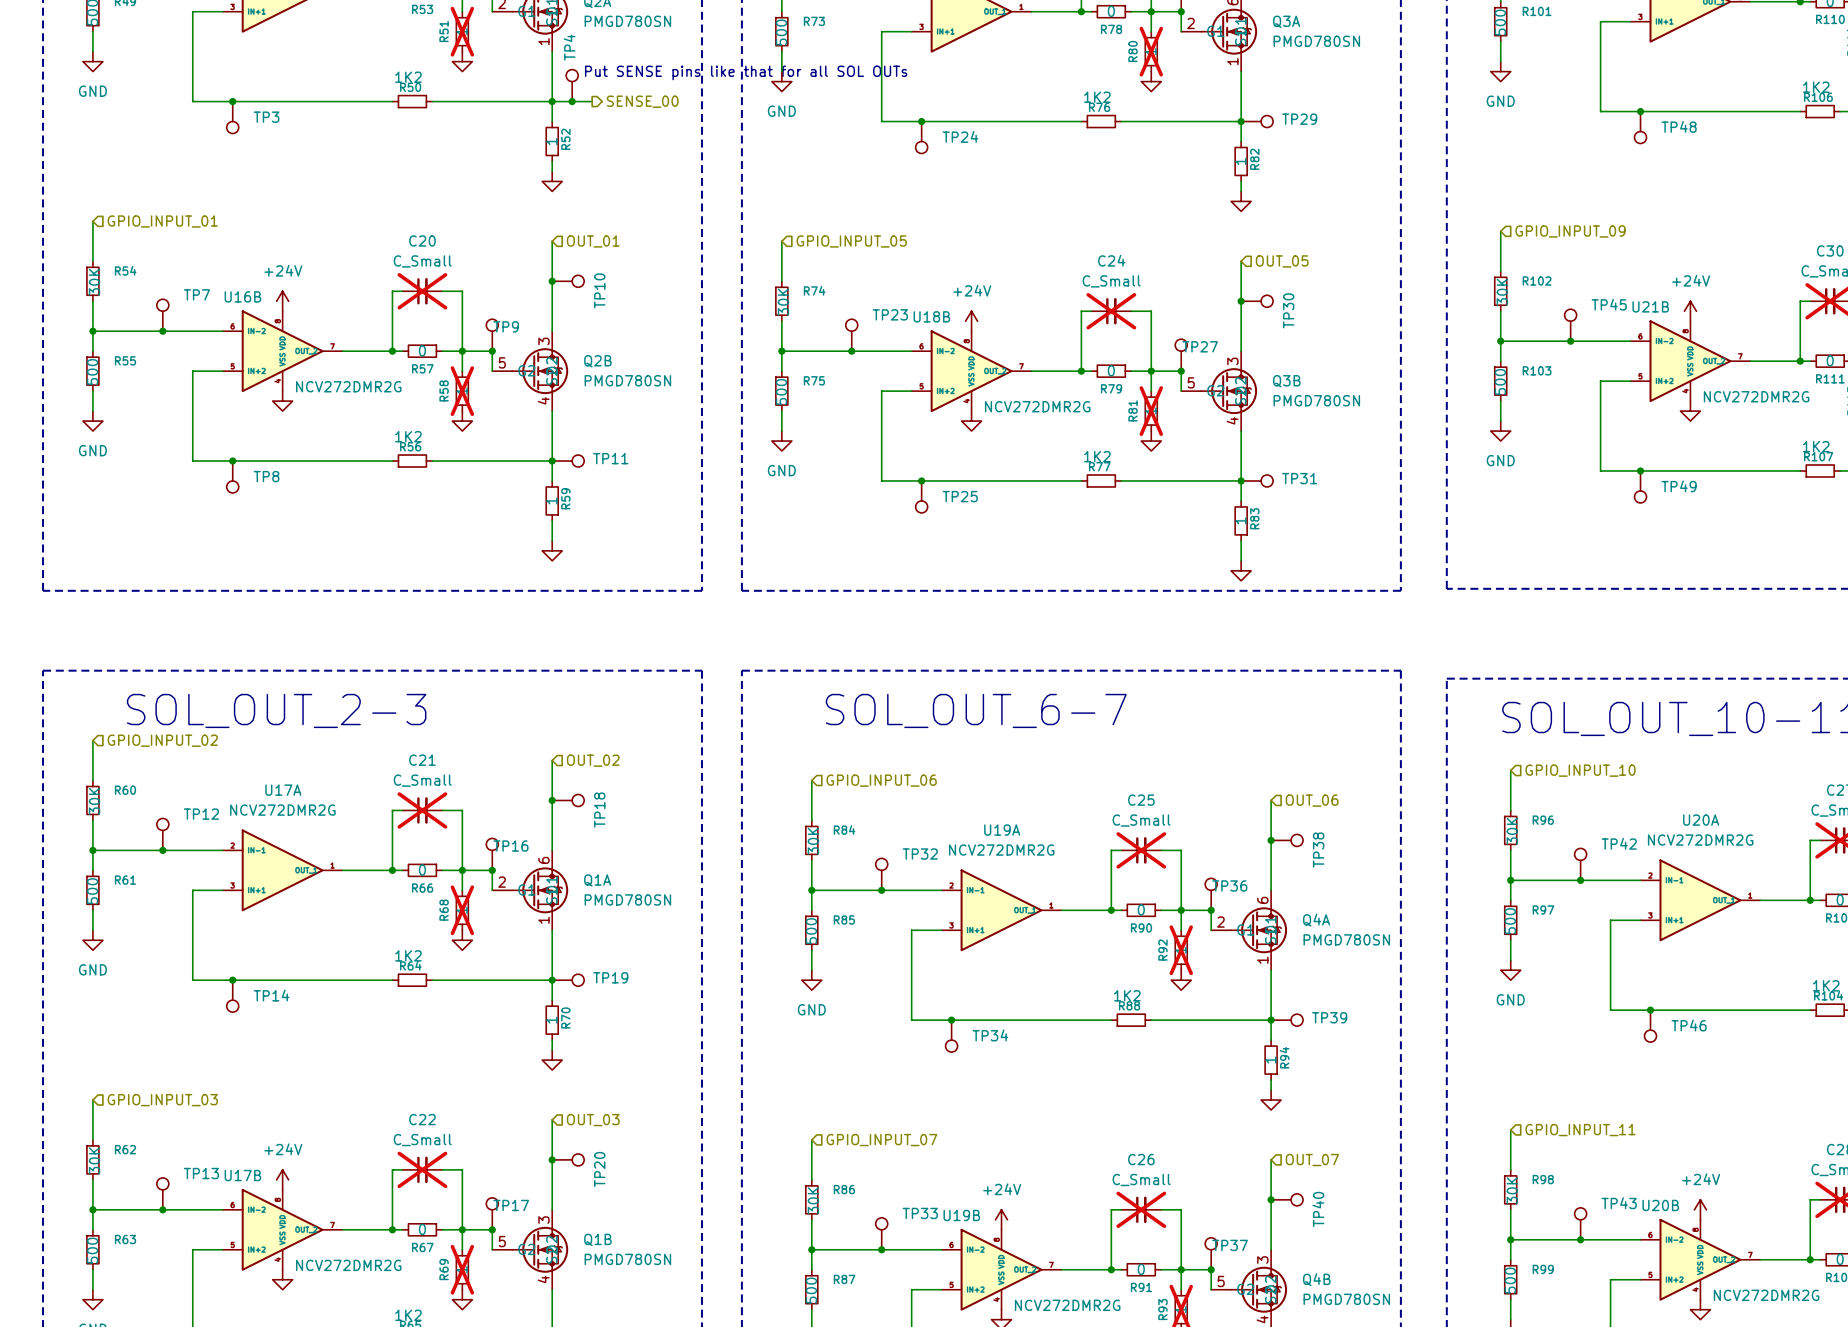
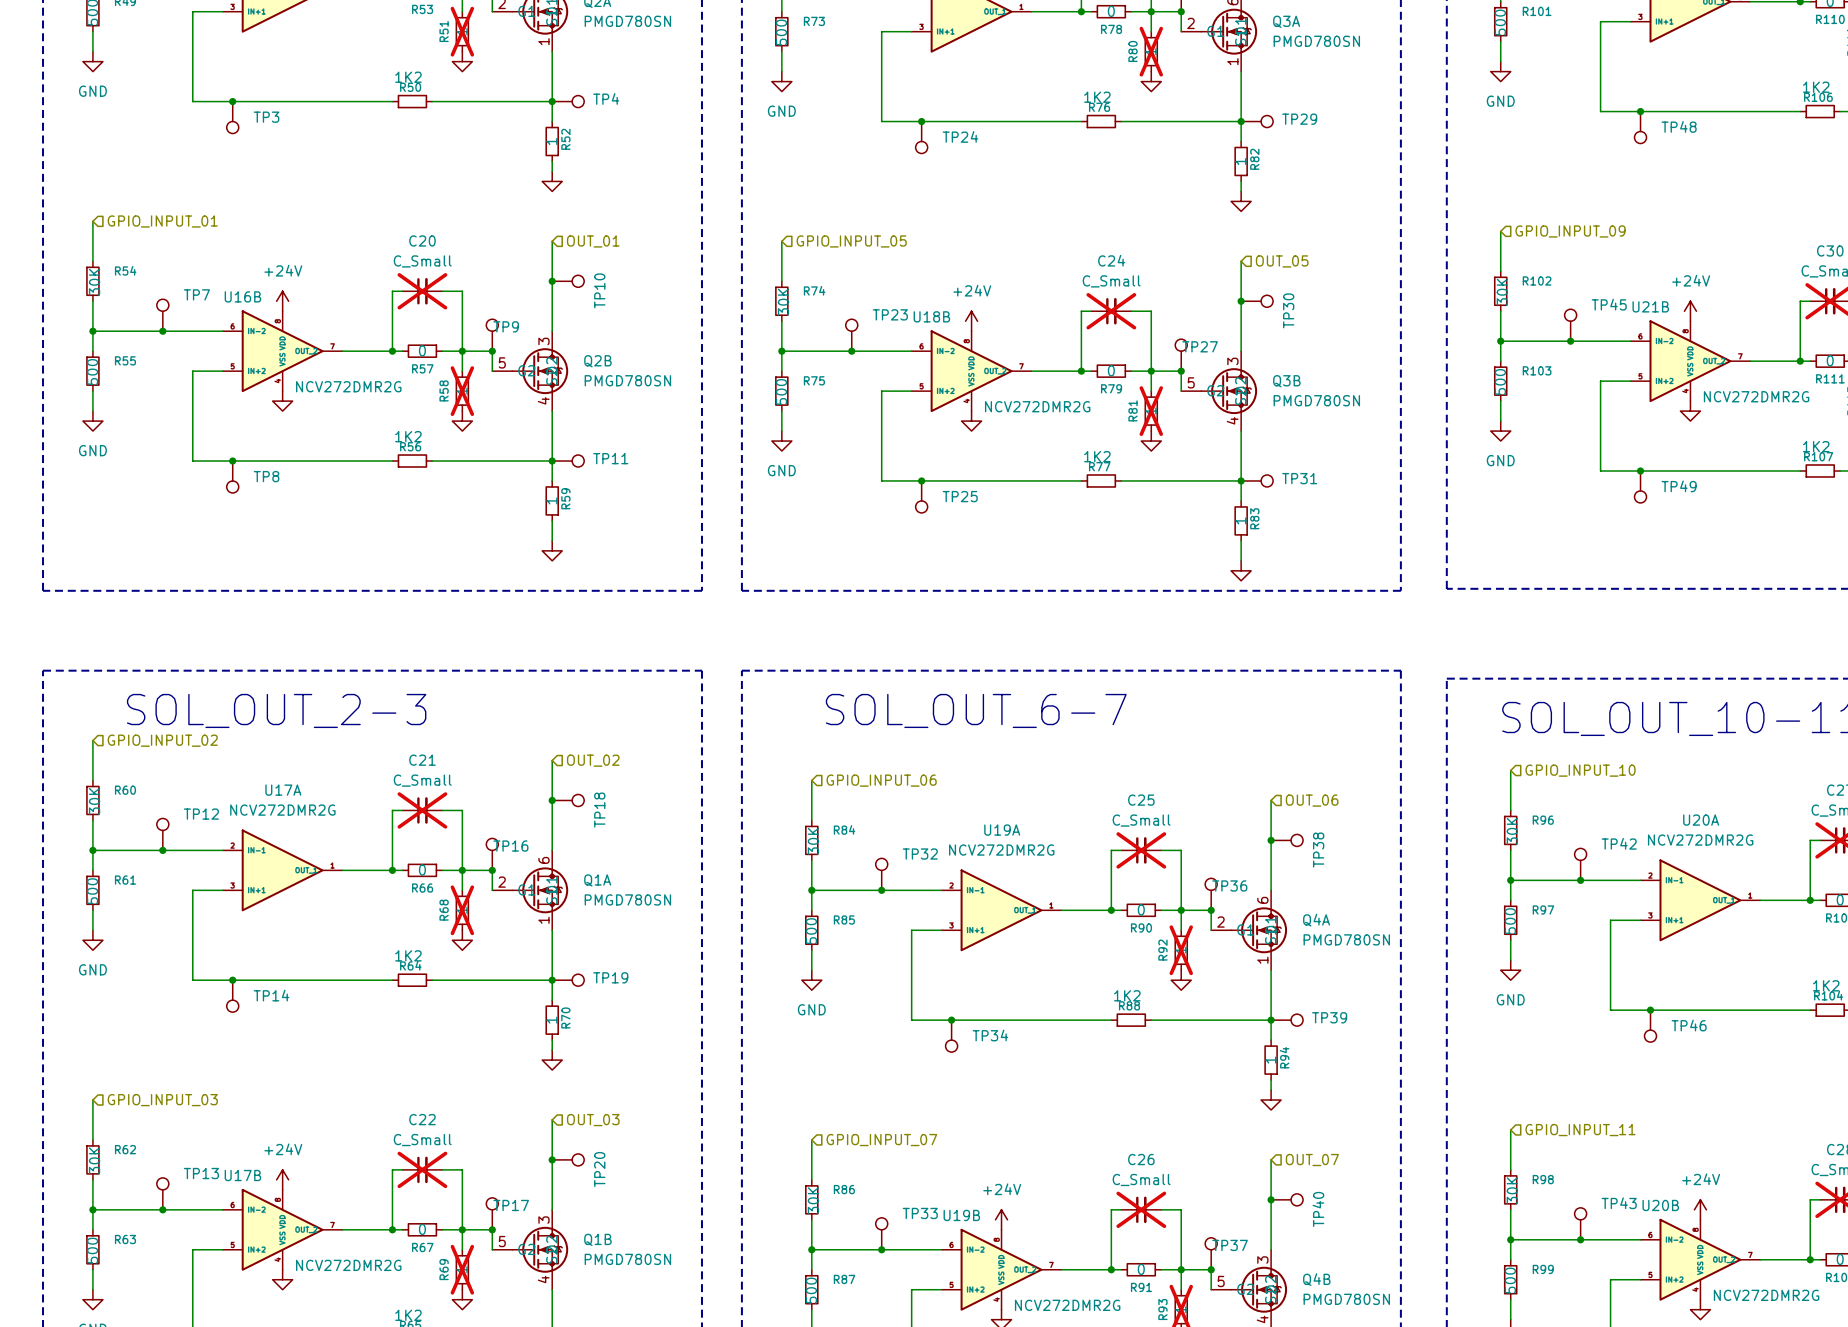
text: Put SENSE pins like that for all SOL OUTs (746, 72) -> none
TP4 rotation: 0° (572, 75) -> 90° clockwise (578, 101)
junction: (572, 101) -> none
hierarchical label: SENSE_00 (642, 101) -> none

